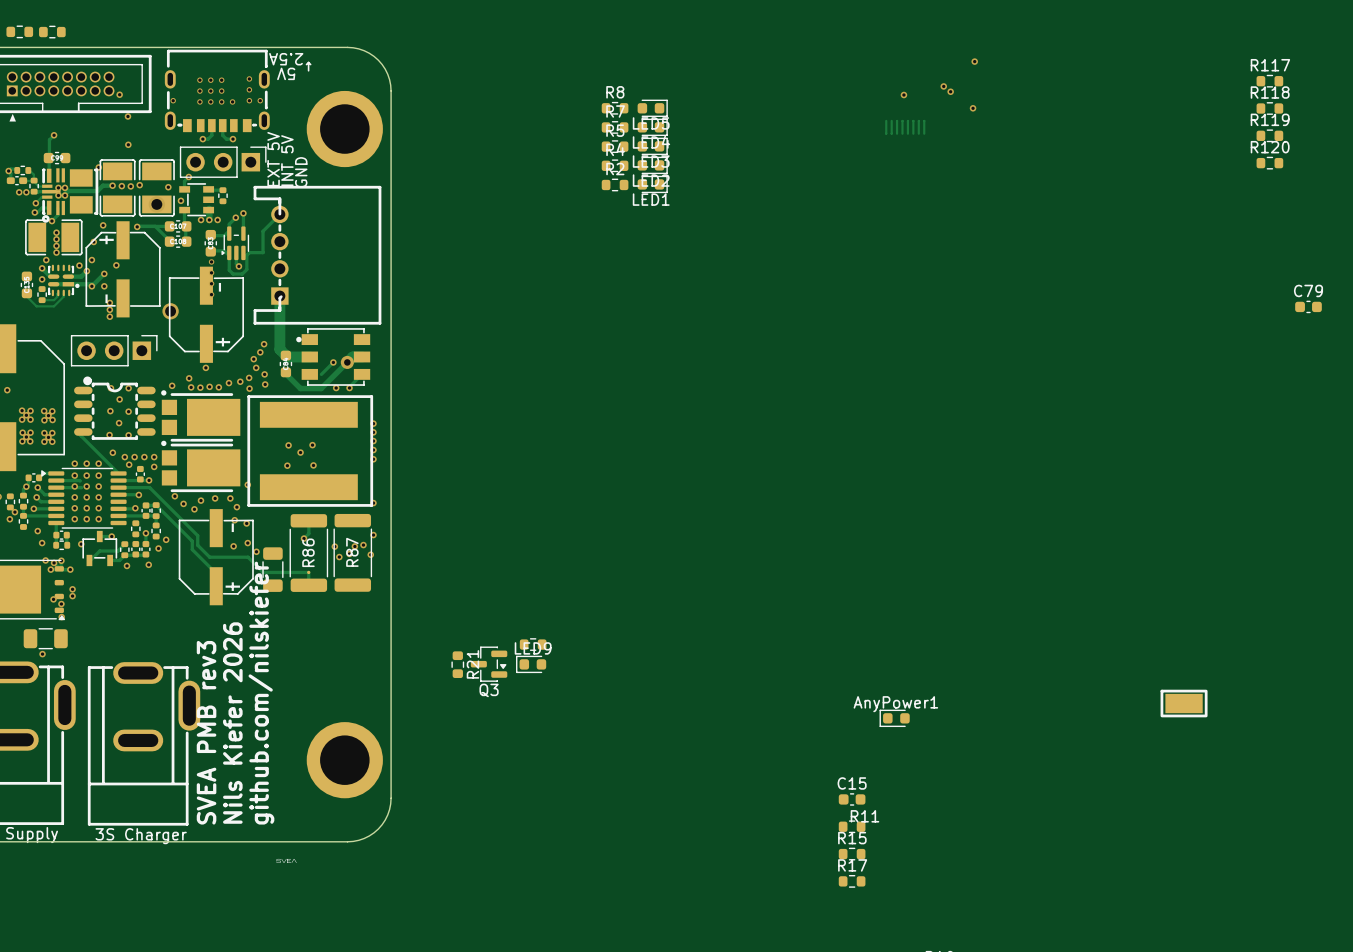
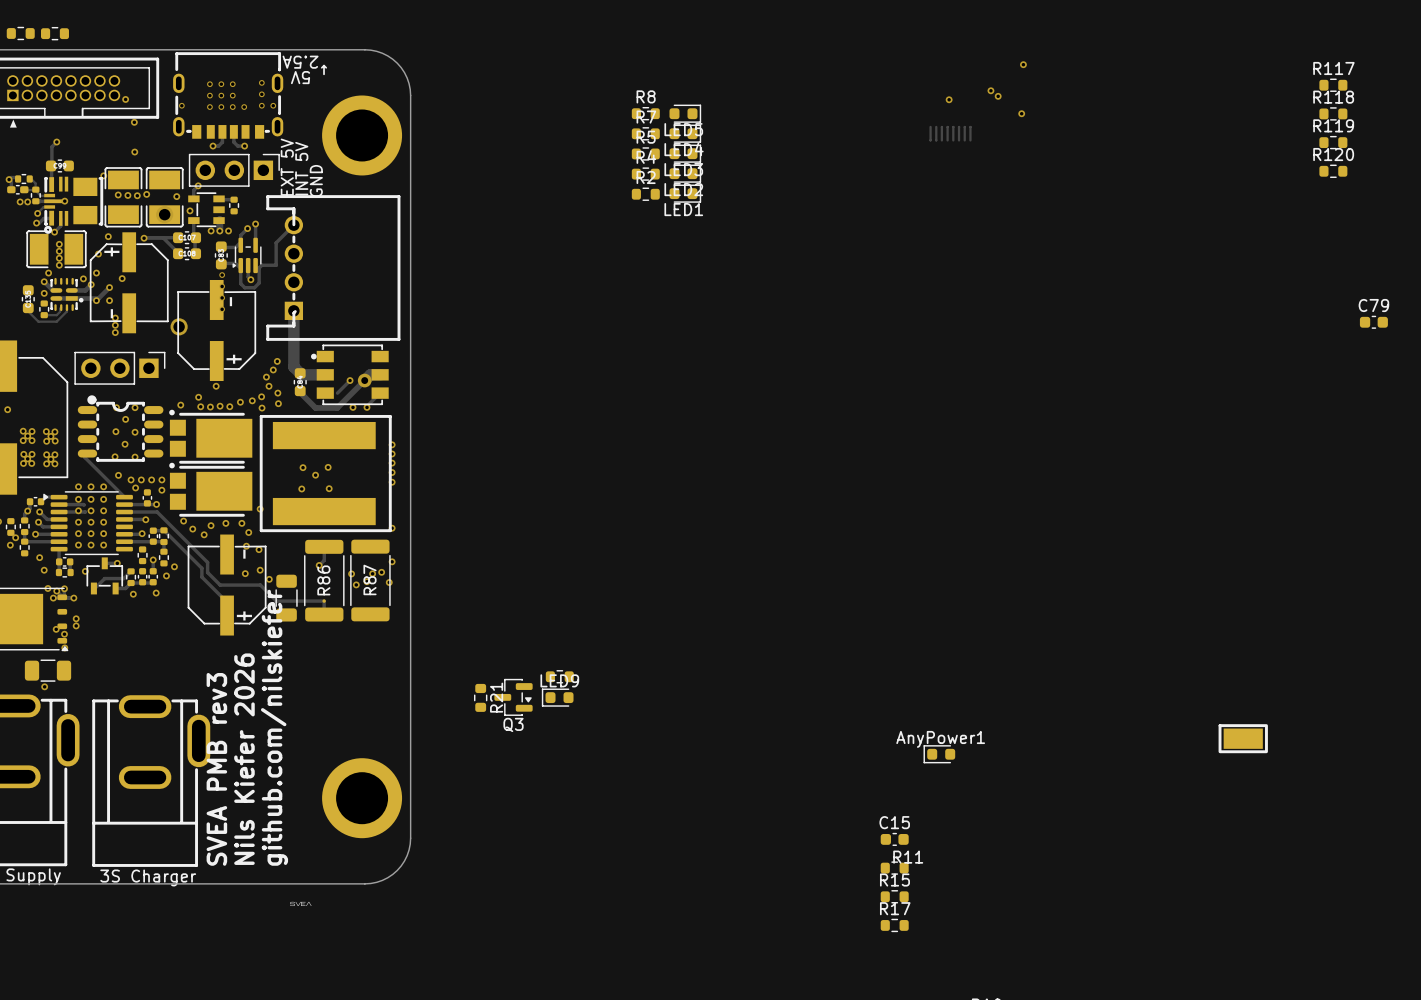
track: (112, 185) (102, 185) (97, 191) (68, 191) -> none
via: (58, 187) -> none
via: (64, 187) -> none
via: none -> (64, 201)
via: (58, 195) -> none
via: (65, 195) -> none

